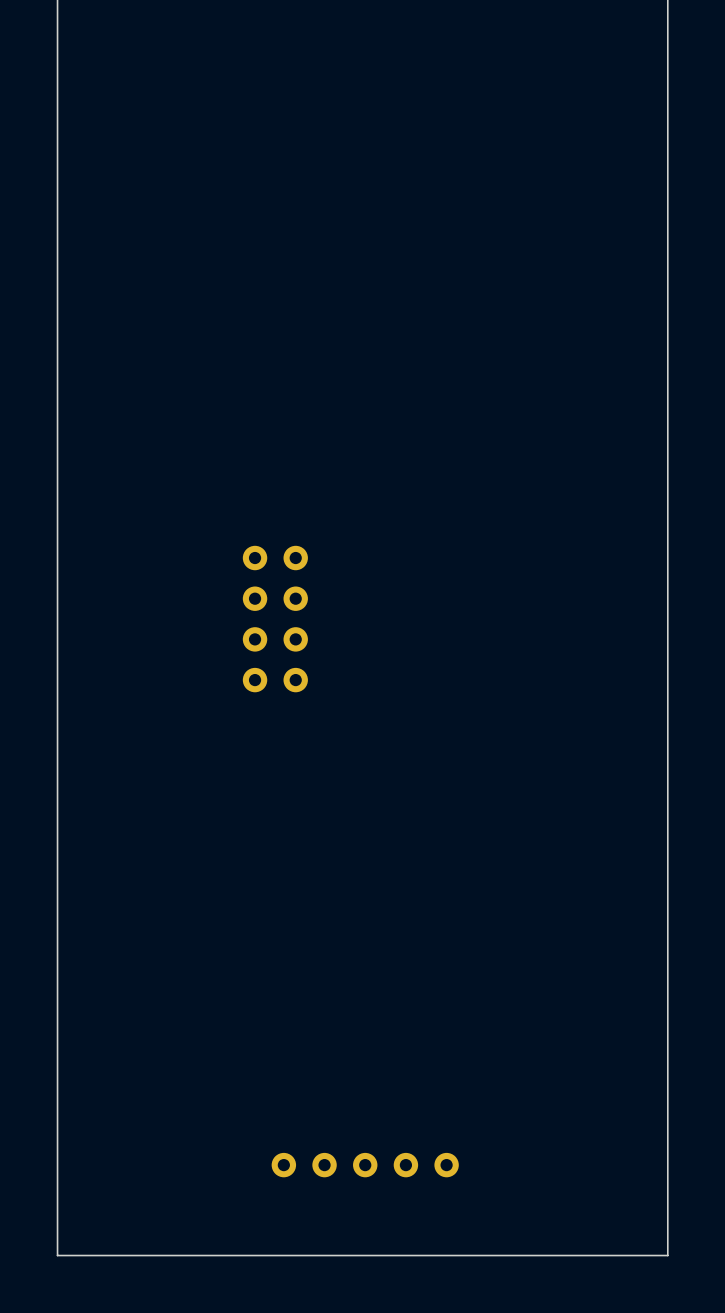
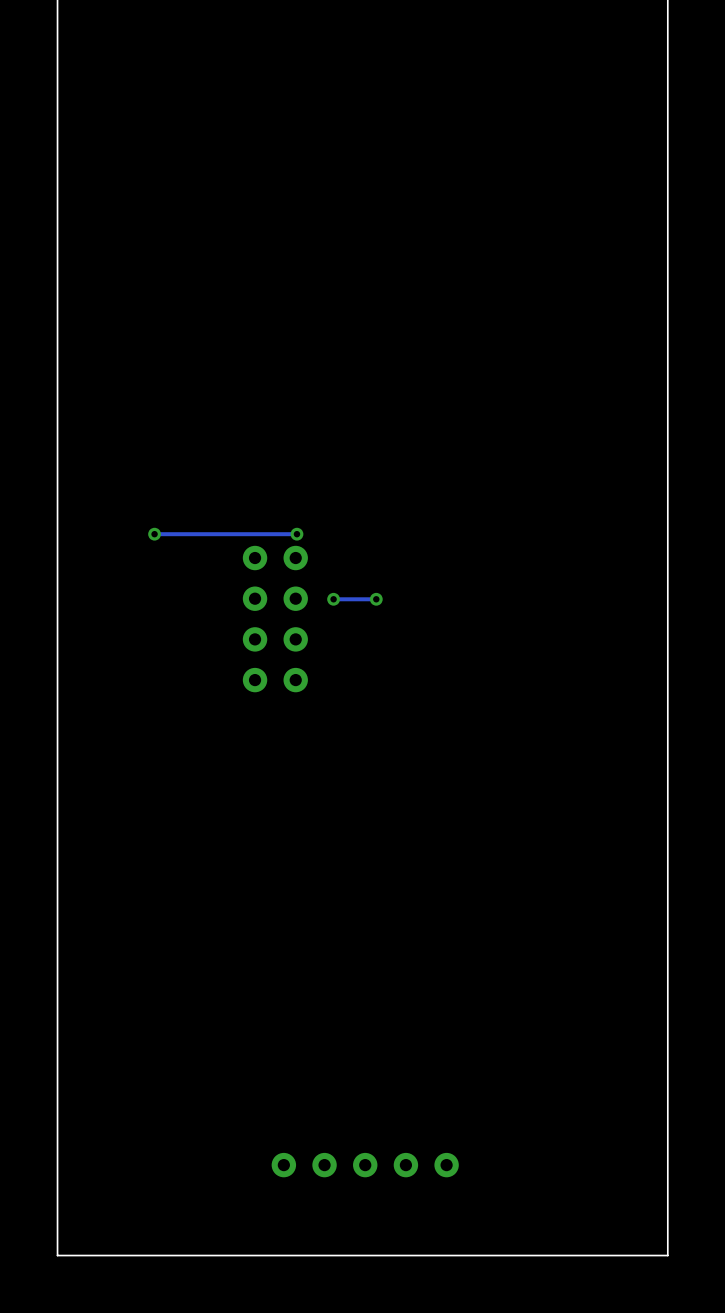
via: none -> (154, 534)
track: none -> (296, 534) (154, 534)
via: none -> (296, 534)
via: none -> (333, 599)
track: none -> (376, 599) (333, 599)
via: none -> (376, 599)

